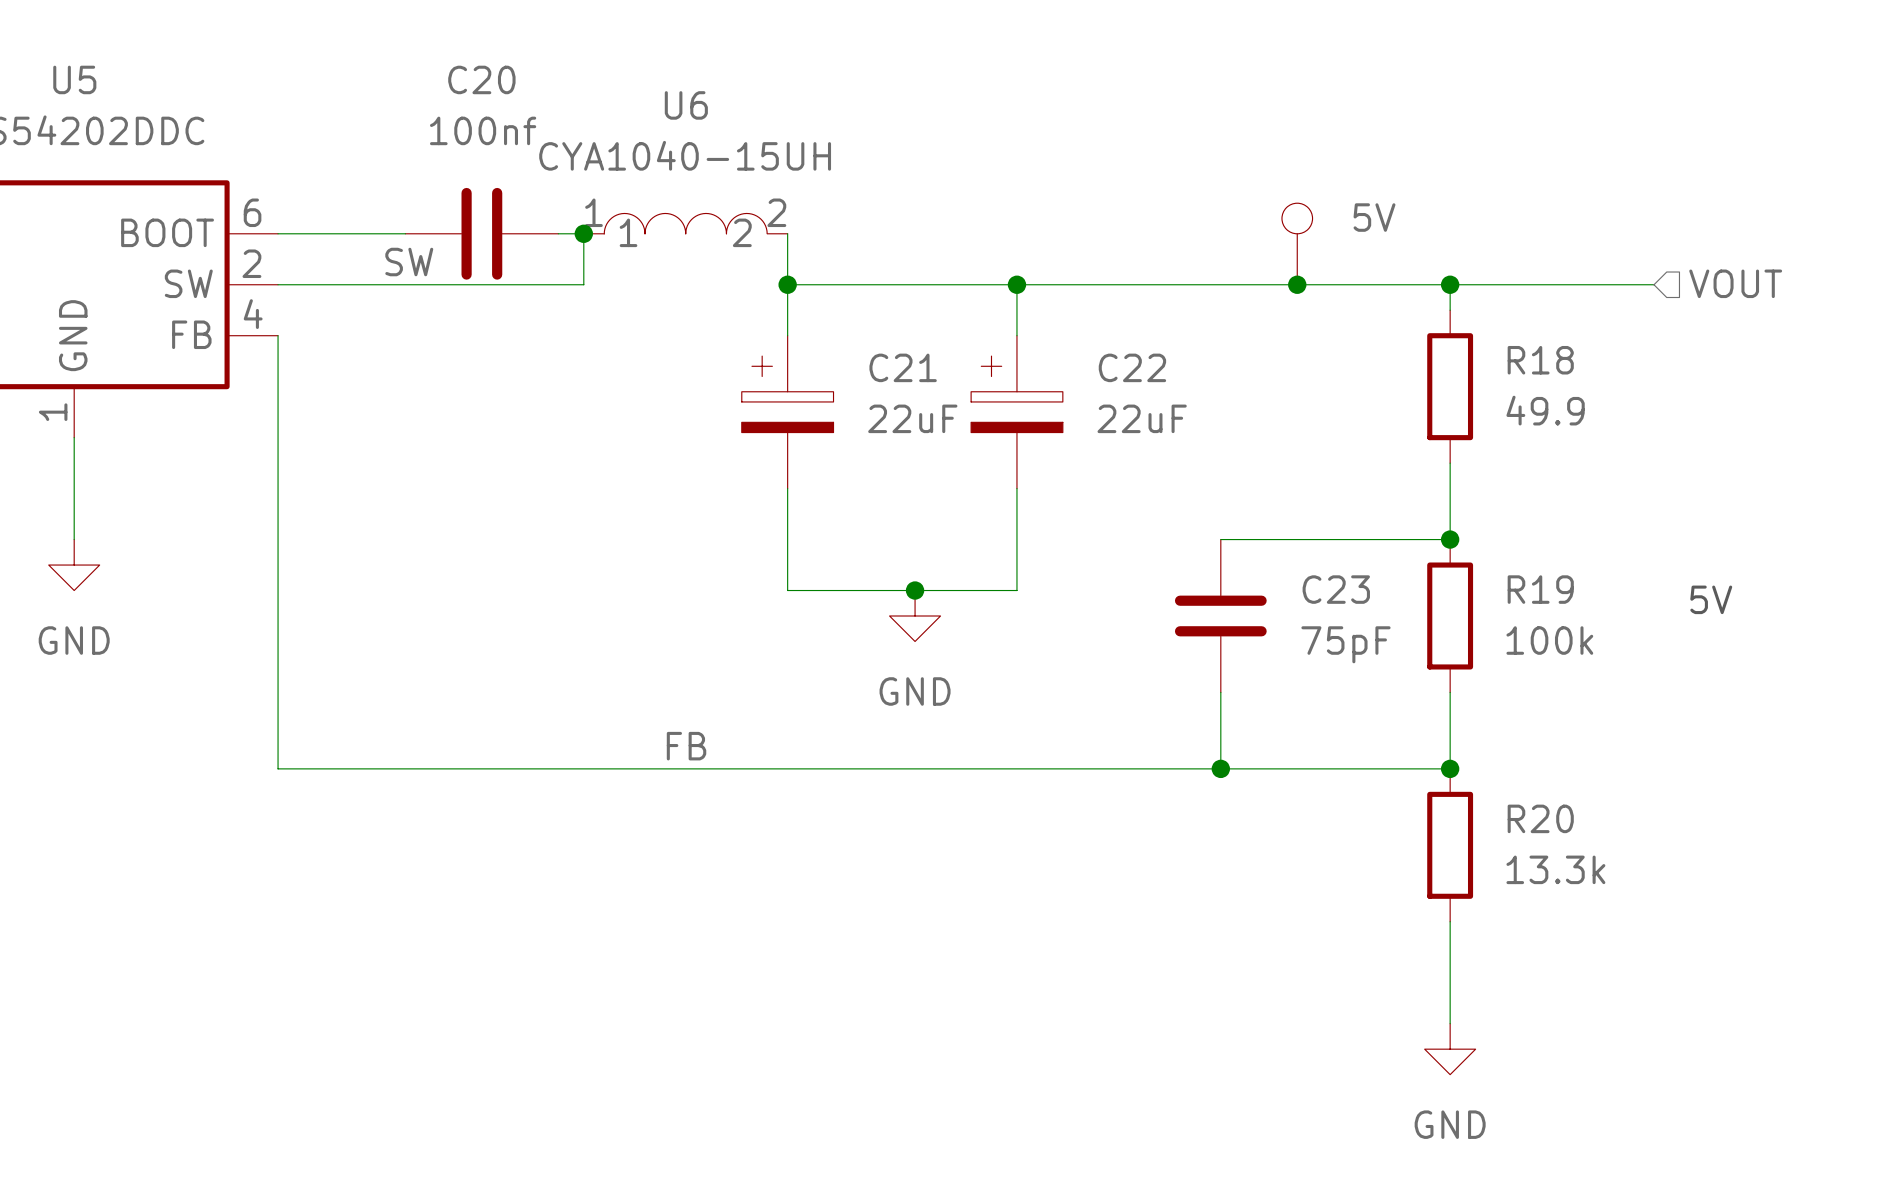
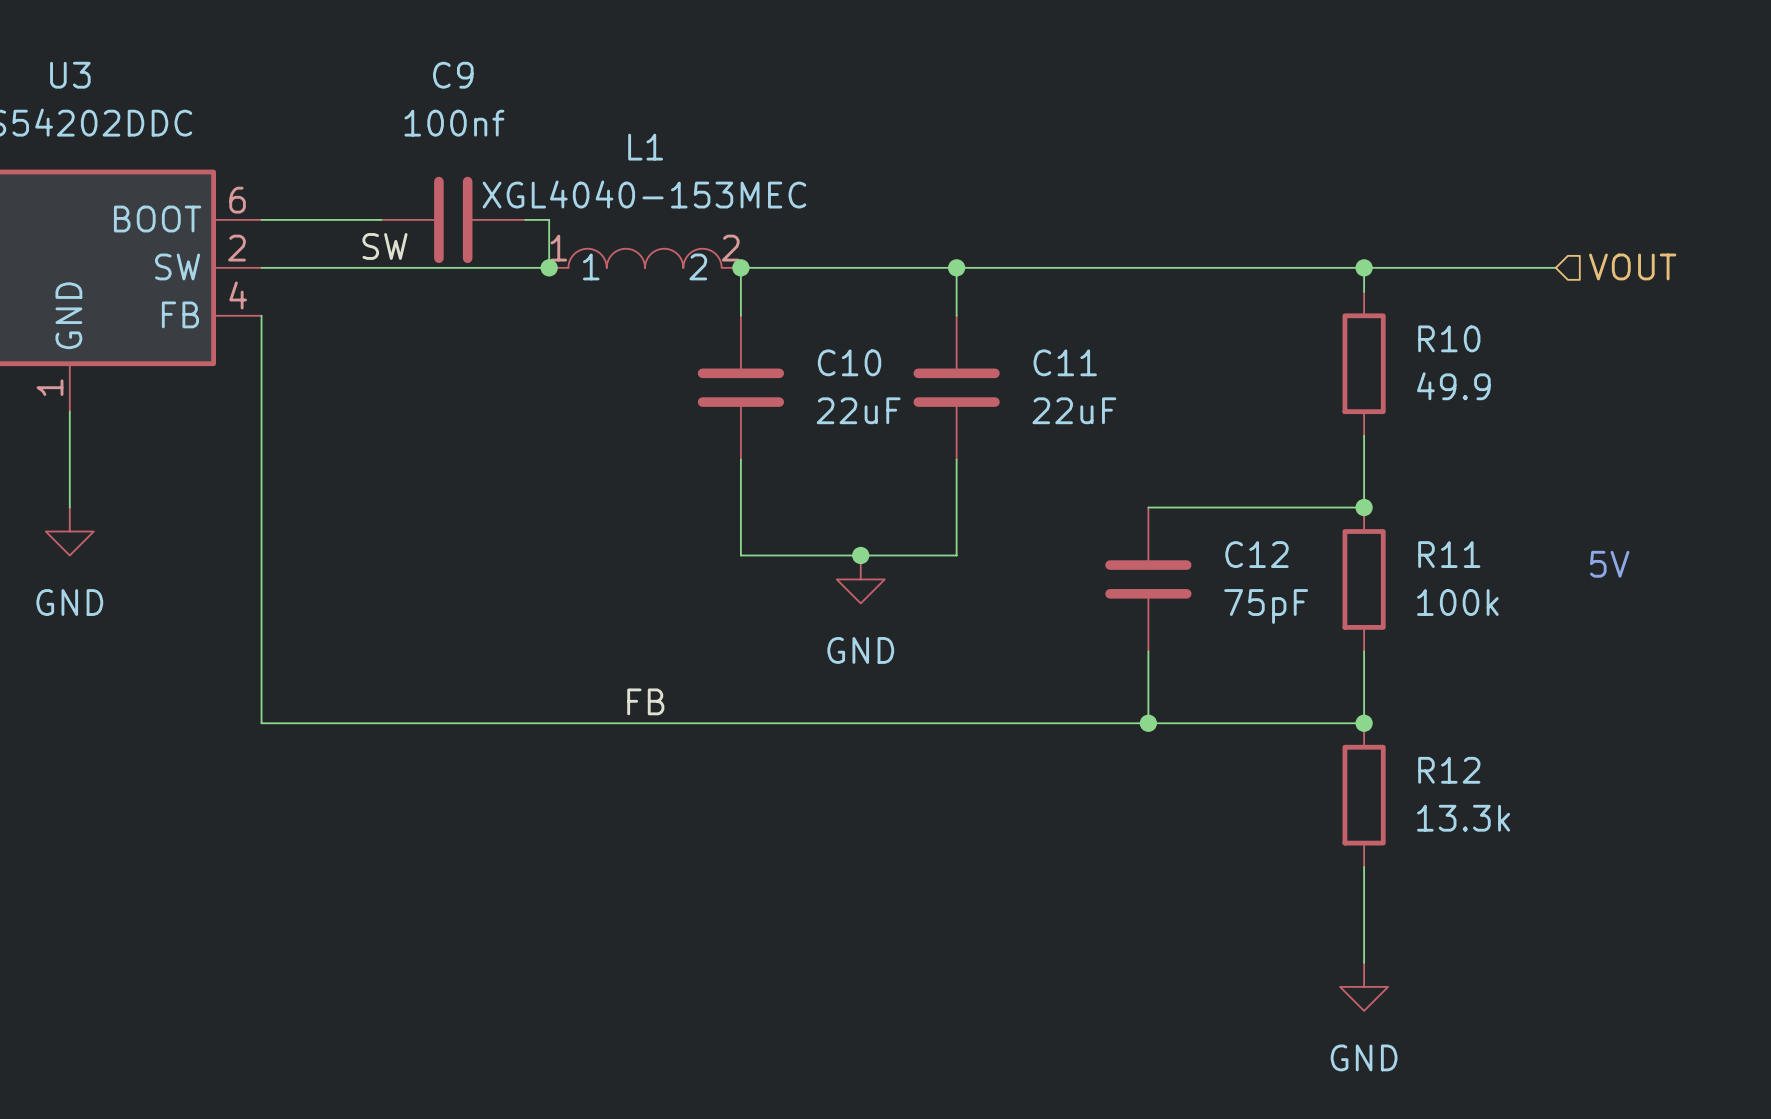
U5 name: U5 (74, 79) -> U3 (70, 75)
C20 name: C20 (481, 79) -> C9 (453, 75)
U6: CYA1040-15UH (685, 223) -> none
junction position: (583, 233) -> (549, 267)
wire: (787, 233) (787, 284) -> none
part: (1297, 243) -> none
L1: none -> XGL4040-153MEC (645, 258)
junction: (1297, 284) -> none
R18 name: R18 (1540, 360) -> R10 (1449, 338)
C21: 22uF (787, 412) -> none
C10: none -> 22uF (740, 387)
C22: 22uF (1016, 412) -> none
C11: none -> 22uF (956, 387)
C23 name: C23 (1336, 589) -> C12 (1256, 554)
R19 name: R19 (1540, 589) -> R11 (1449, 554)
R20 name: R20 (1540, 818) -> R12 (1449, 770)

